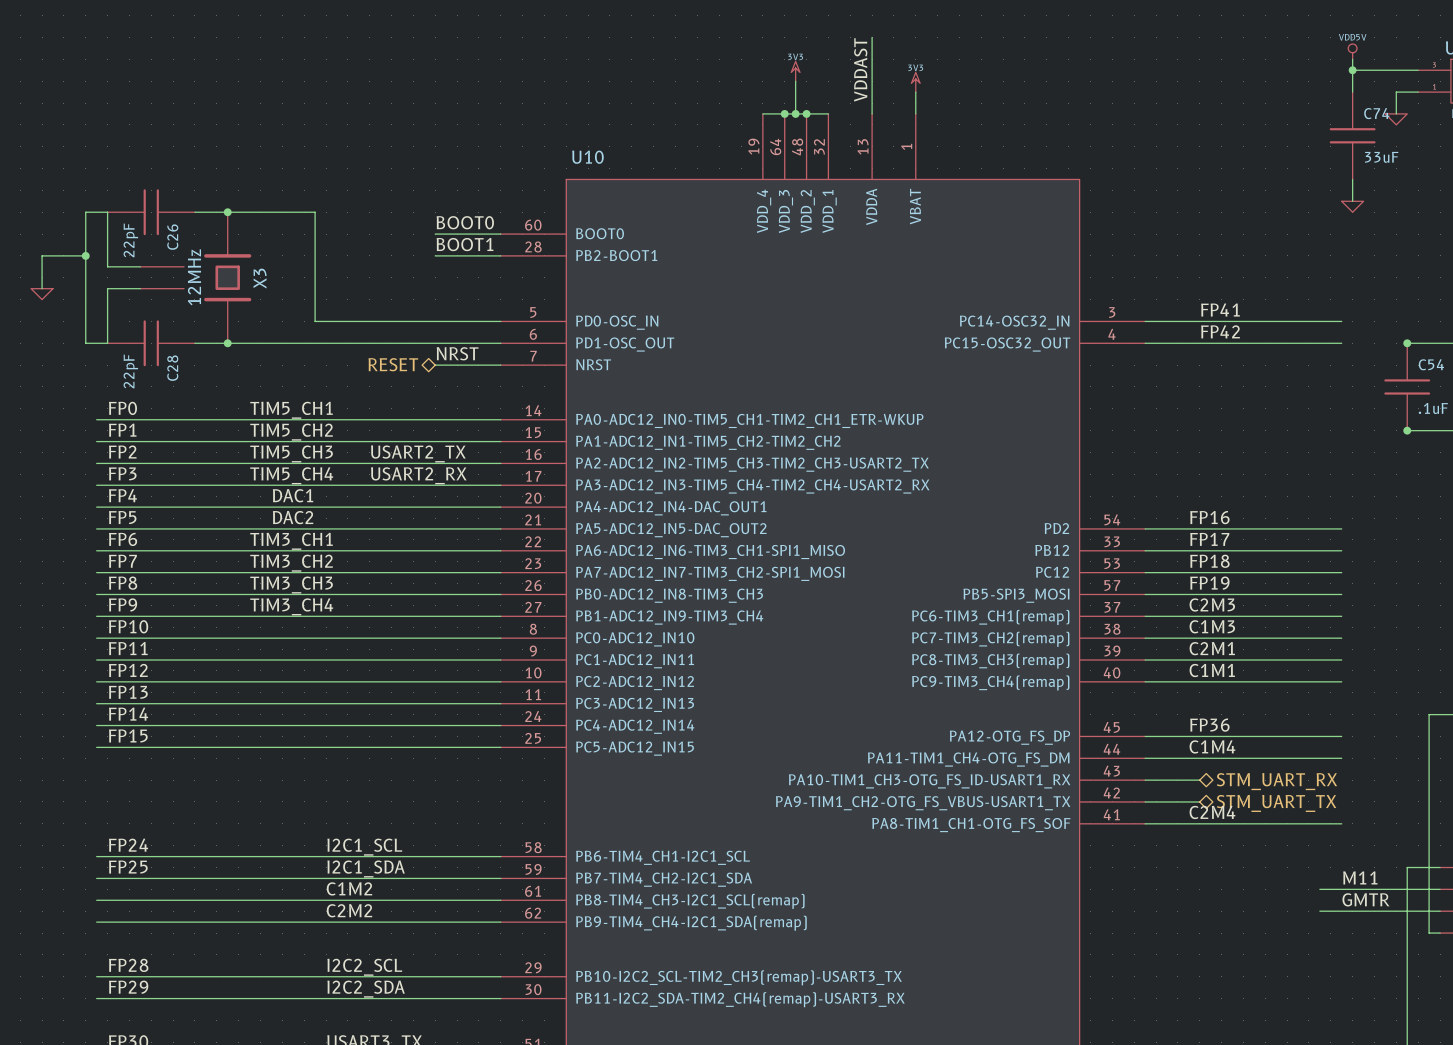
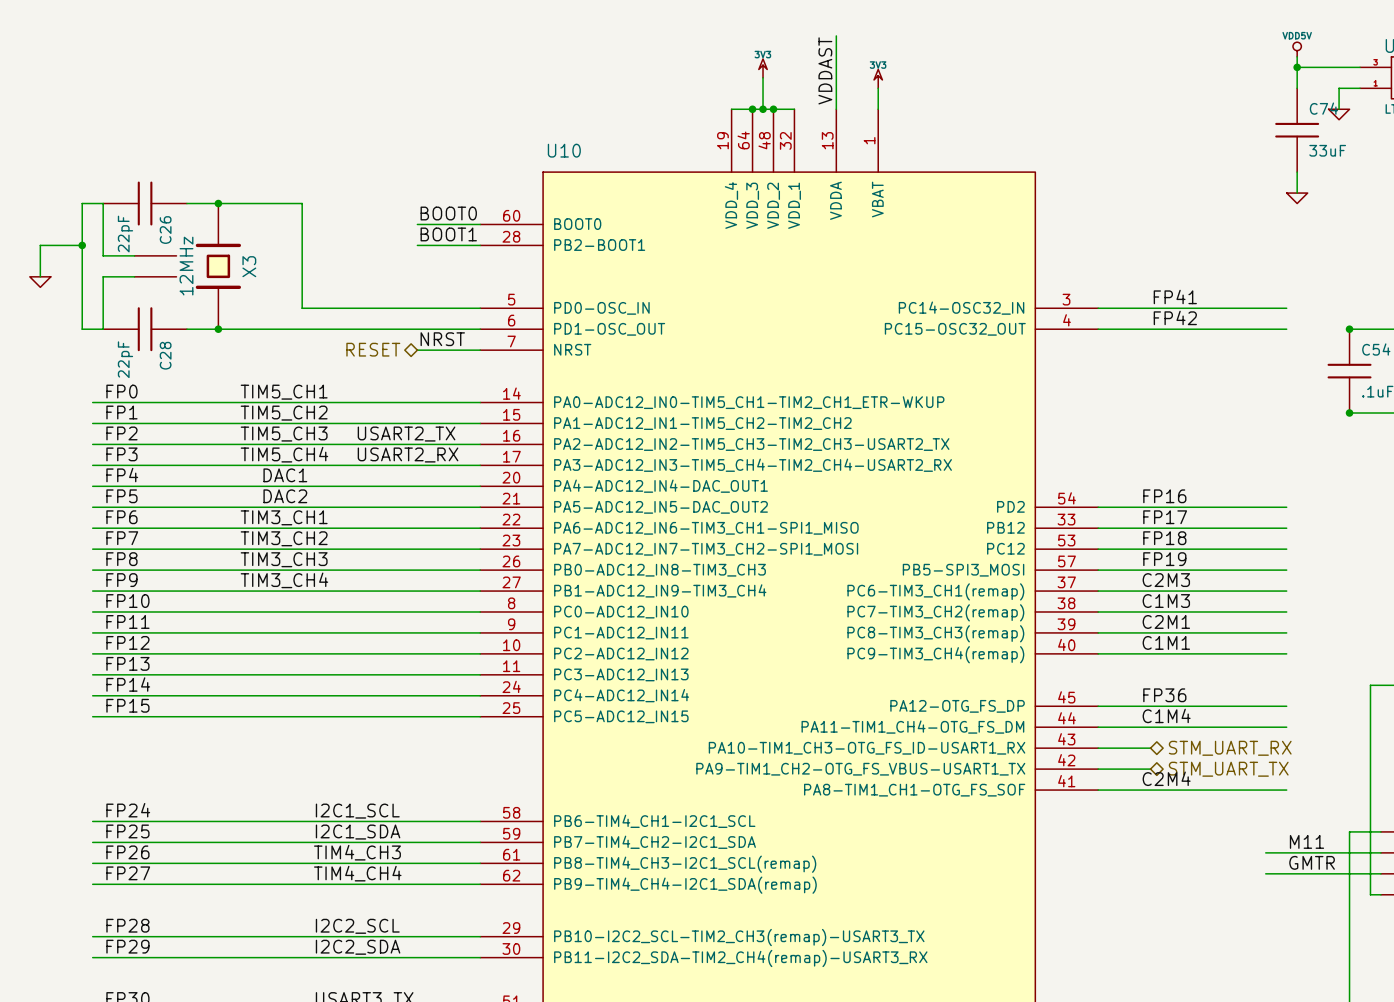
label: none -> FP26 (127, 852)
label: C1M2 (349, 888) -> TIM4_CH3 (357, 852)
label: none -> FP27 (128, 873)
label: C2M2 (349, 910) -> TIM4_CH4 (357, 873)

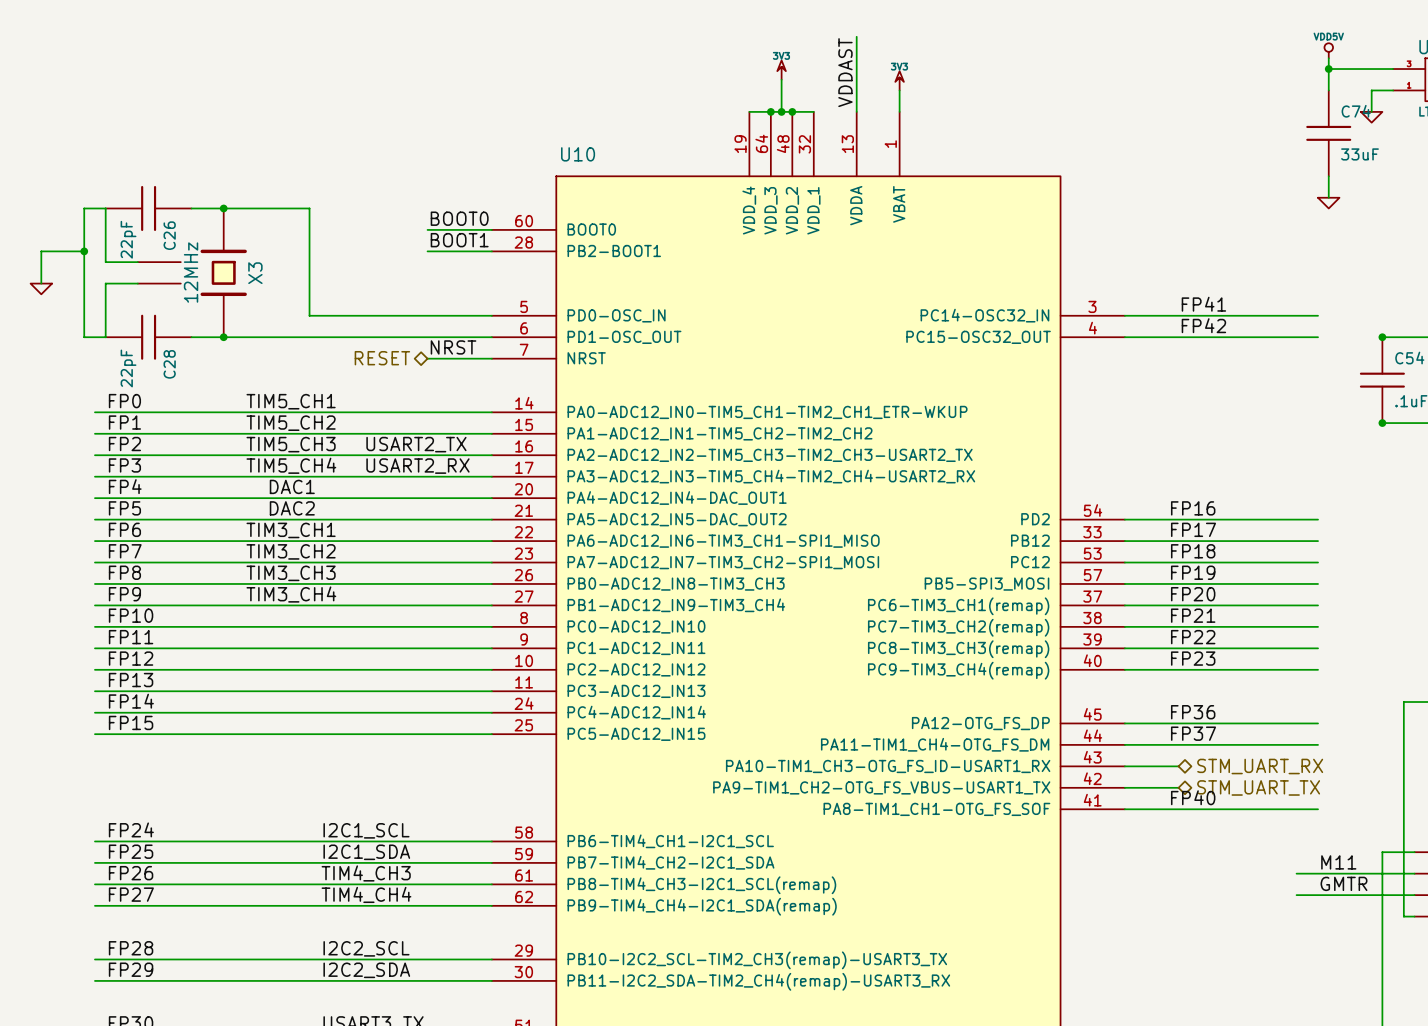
label: C2M3 (1166, 580) -> FP20 (1193, 594)
label: C1M3 (1166, 601) -> FP21 (1193, 615)
label: C2M1 (1166, 621) -> FP22 (1193, 637)
label: C1M1 (1166, 642) -> FP23 (1193, 658)
label: C1M4 (1166, 715) -> FP37 (1193, 733)
label: C2M4 (1166, 778) -> FP40 (1193, 797)

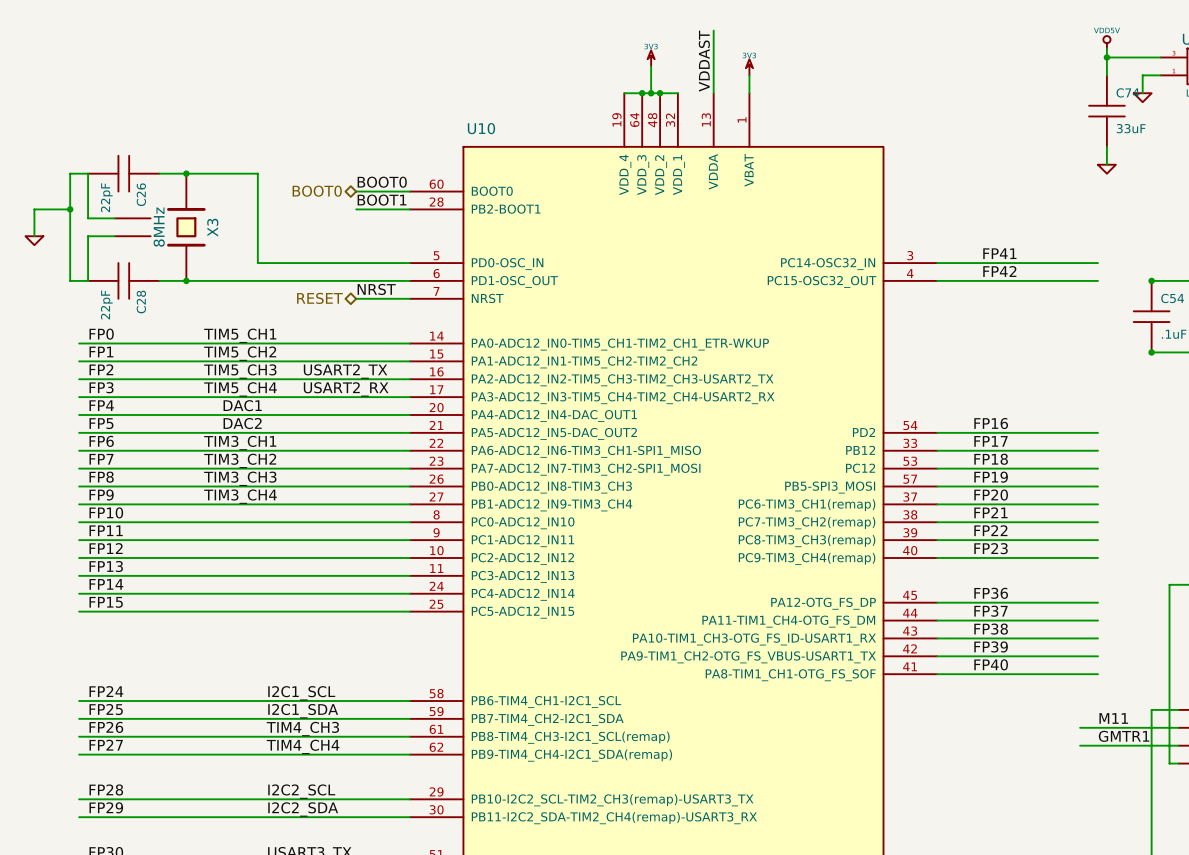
hierarchical label: none -> BOOT0 (317, 191)
X3 value: 12MHz (191, 272) -> 8MHz (159, 227)
label: none -> FP38 (991, 629)
wire: none -> (981, 638) (1098, 638)
hierarchical label: STM_UART_RX (1260, 766) -> none
label: none -> FP39 (991, 646)
wire: none -> (981, 656) (1098, 656)
hierarchical label: STM_UART_TX (1258, 787) -> none
label: GMTR (1344, 883) -> GMTR1 (1124, 736)

